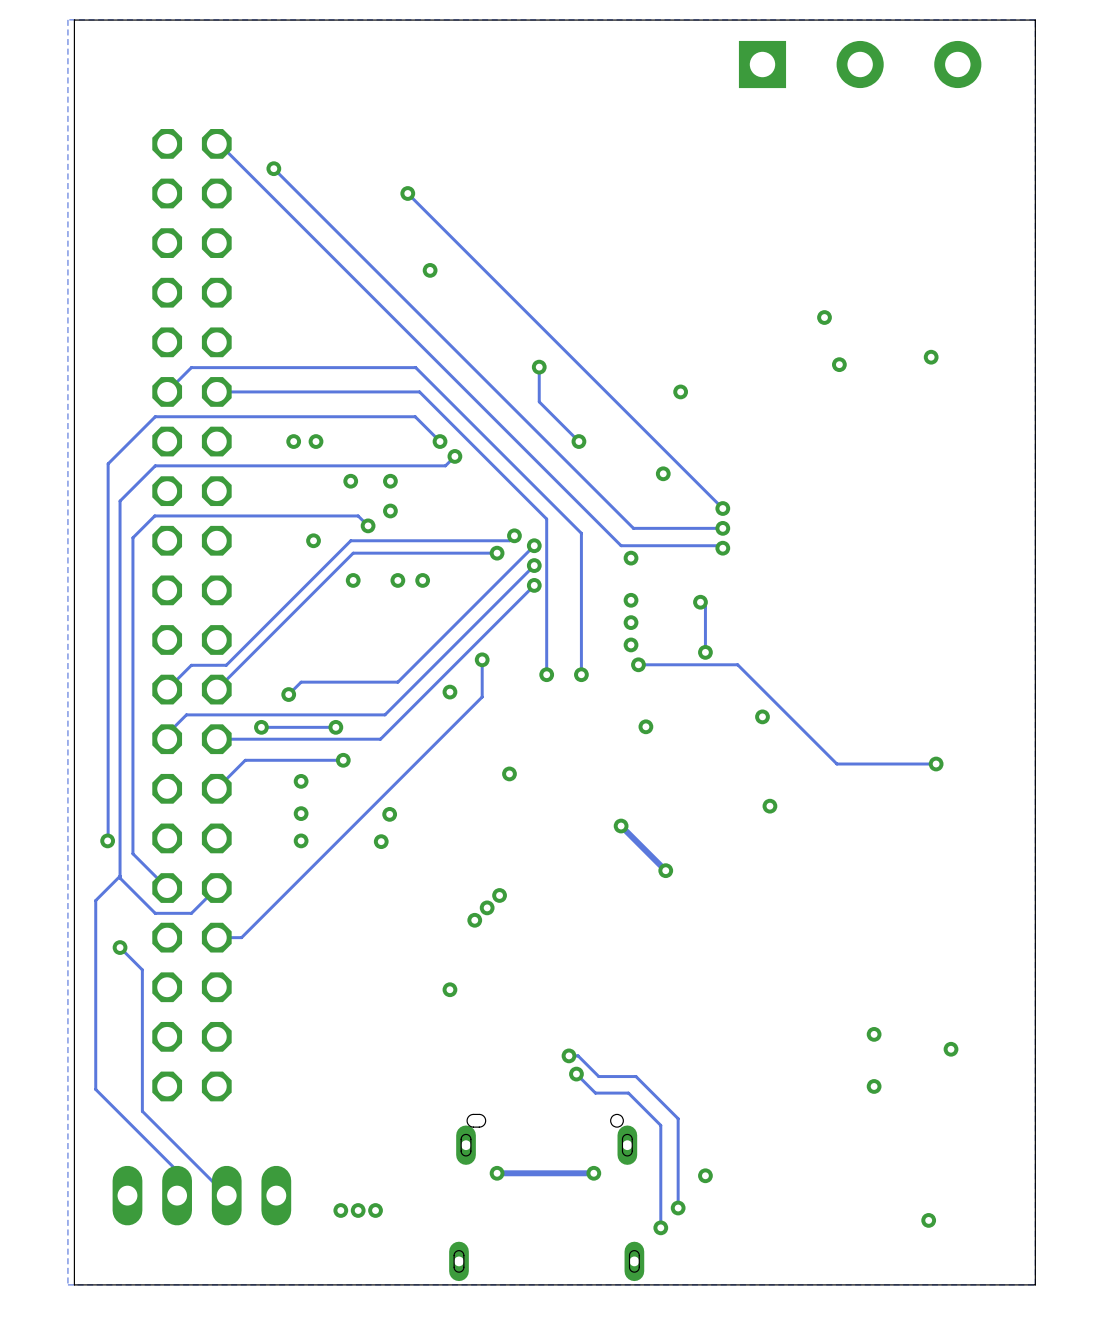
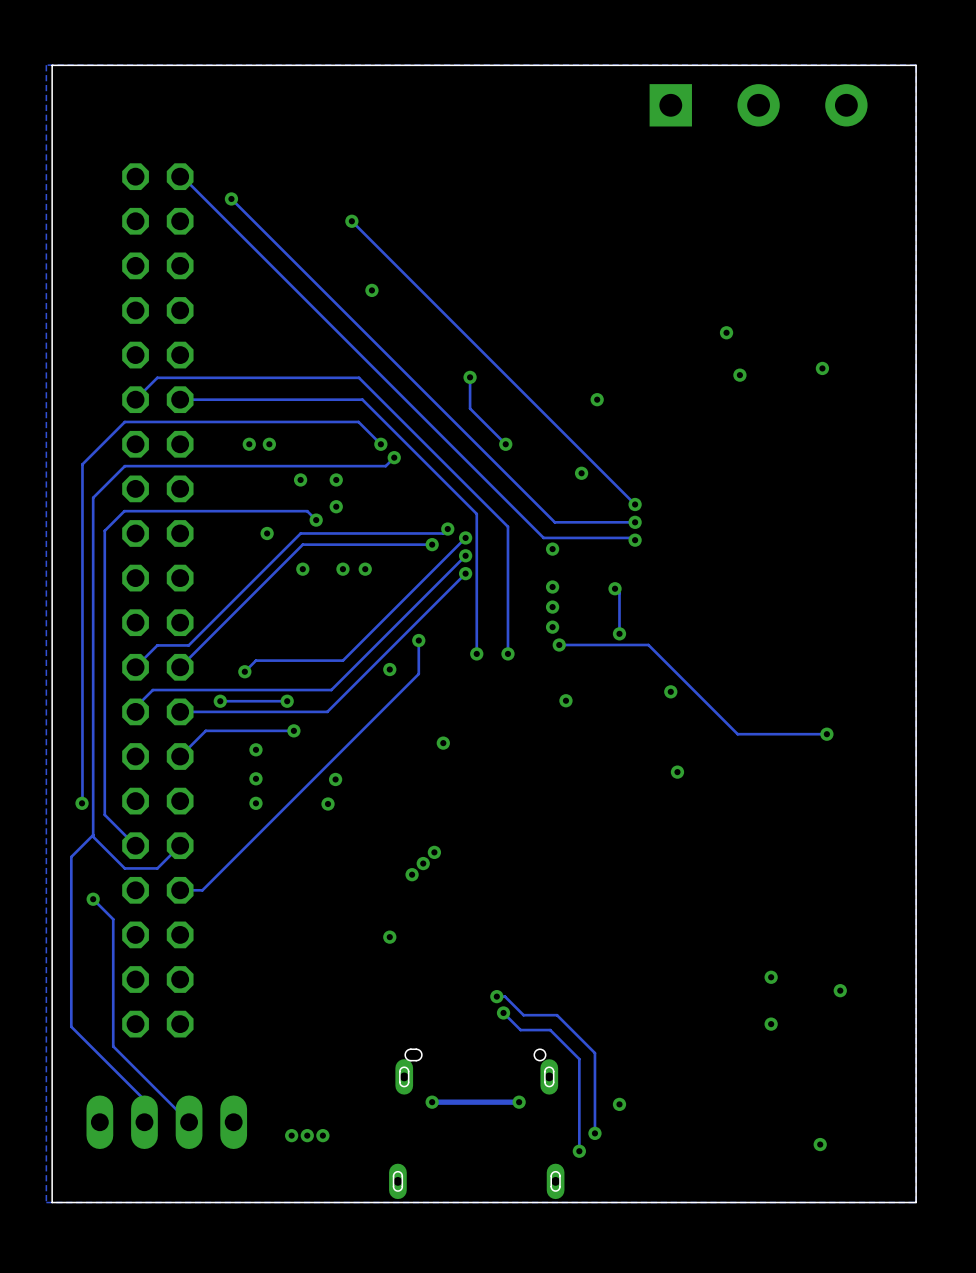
track: (621, 826) (665, 870) -> none
via: (621, 826) -> none
via: (665, 870) -> none

